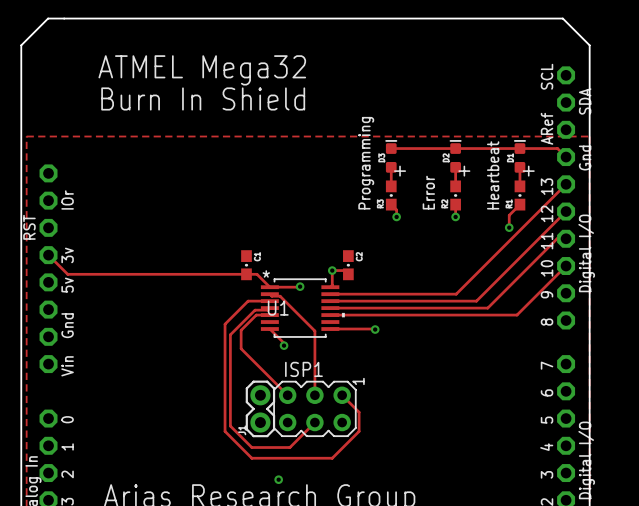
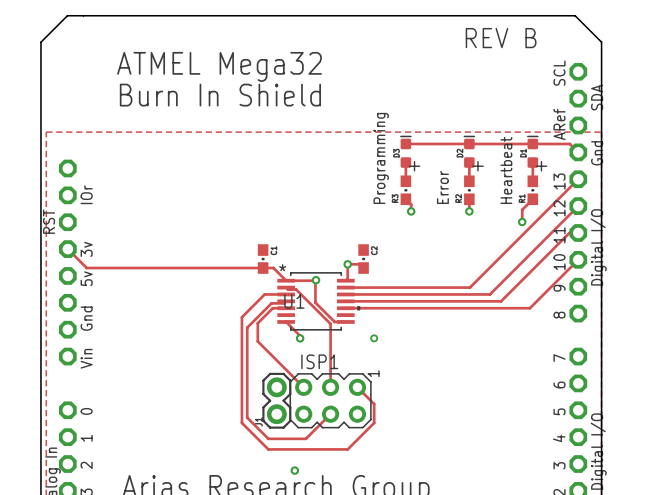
text: none -> REV B (501, 38)
track: (330, 329) (375, 329) -> (345, 321) (334, 321) (315, 302) (315, 280)
via: (375, 329) -> none
via: none -> (374, 338)

